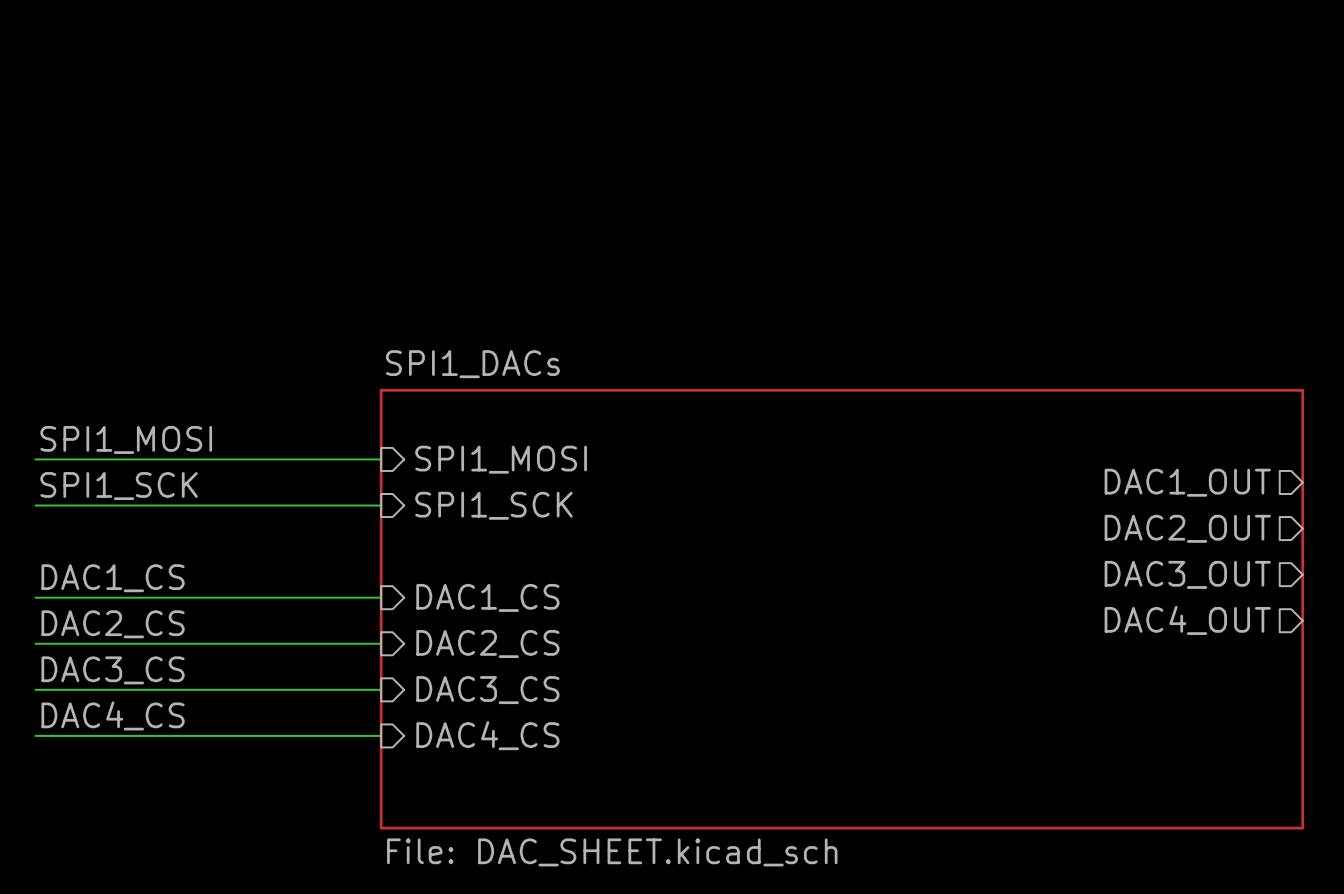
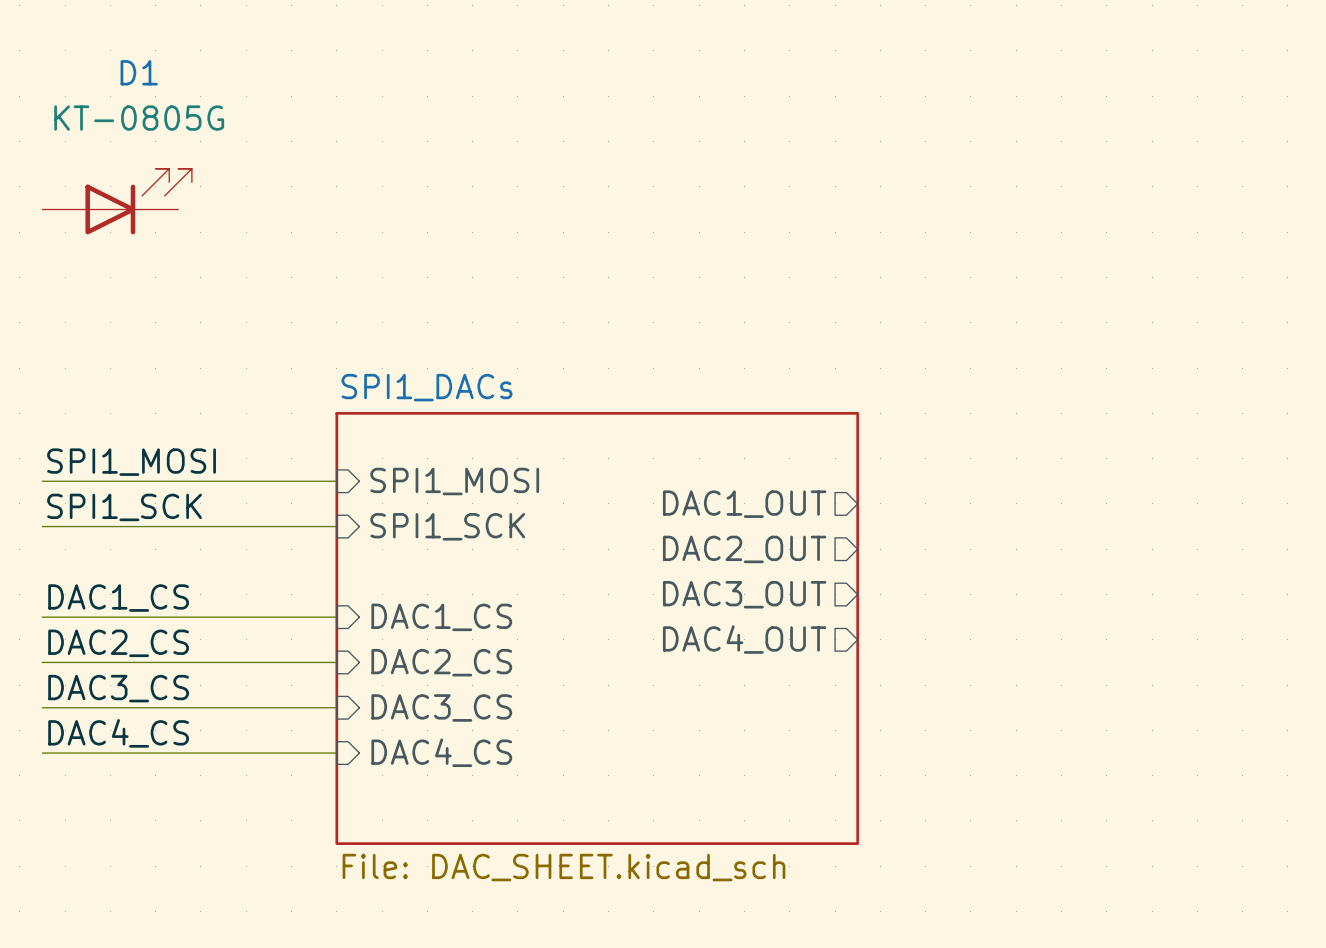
D1: none -> KT-0805G (117, 201)
sheet SPI1_DACs name position: SPI1_DACs (472, 364) -> SPI1_DACs (427, 387)
sheet SPI1_DACs shape: [379, 388, 1305, 830] -> [335, 411, 860, 845]
wire: (335, 459) (381, 459) -> none
sheet pin position: SPI1_MOSI (501, 459) -> SPI1_MOSI (454, 481)
sheet pin position: DAC1_OUT (1187, 482) -> DAC1_OUT (744, 504)
wire: (335, 505) (381, 505) -> none
sheet pin position: SPI1_SCK (493, 505) -> SPI1_SCK (447, 526)
sheet pin position: DAC2_OUT (1187, 528) -> DAC2_OUT (744, 549)
sheet pin position: DAC3_OUT (1187, 574) -> DAC3_OUT (744, 594)
wire: (335, 597) (381, 597) -> none
sheet pin position: DAC1_CS (487, 597) -> DAC1_CS (441, 617)
sheet pin position: DAC4_OUT (1187, 620) -> DAC4_OUT (744, 639)
wire: (335, 643) (381, 643) -> none
sheet pin position: DAC2_CS (487, 644) -> DAC2_CS (441, 662)
wire: (335, 689) (381, 689) -> none
sheet pin position: DAC3_CS (487, 690) -> DAC3_CS (441, 707)
wire: (335, 735) (381, 735) -> none
sheet pin position: DAC4_CS (487, 735) -> DAC4_CS (441, 752)
sheet SPI1_DACs value position: File: DAC_SHEET.kicad_sch (612, 852) -> File: DAC_SHEET.kicad_sch (563, 867)

